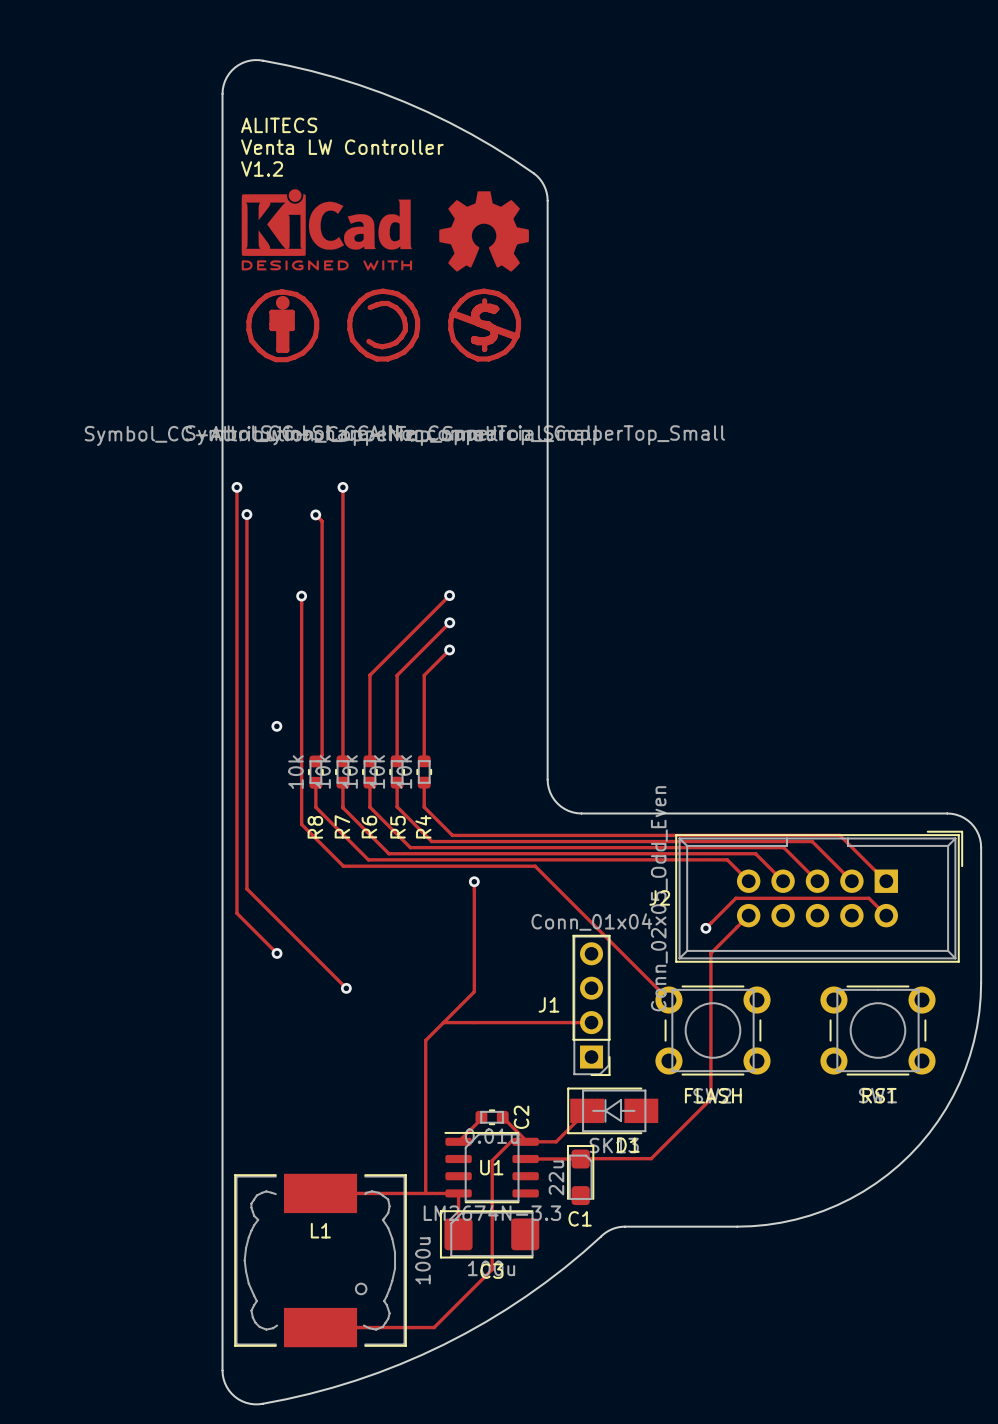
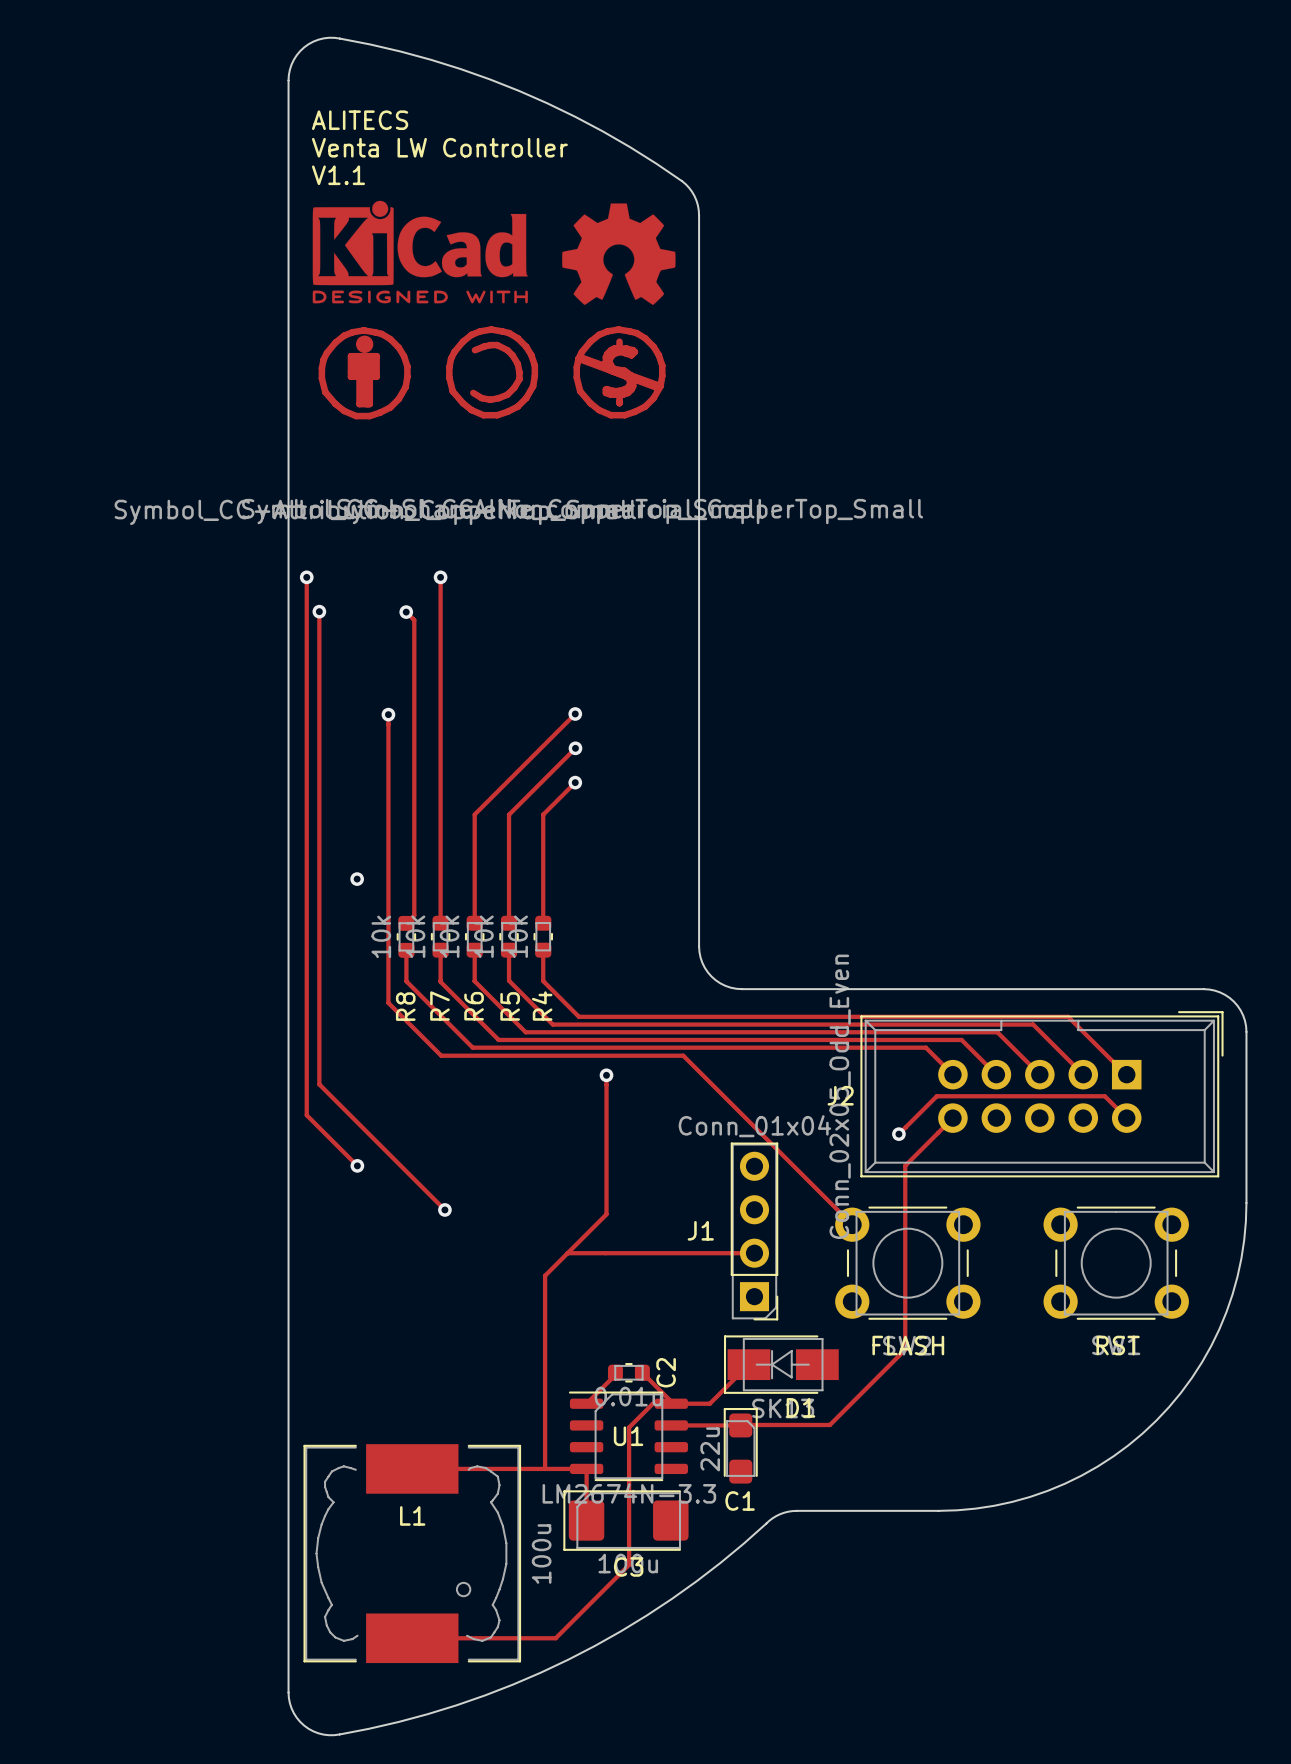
text: V1.2 (262, 168) -> V1.1 (338, 175)

